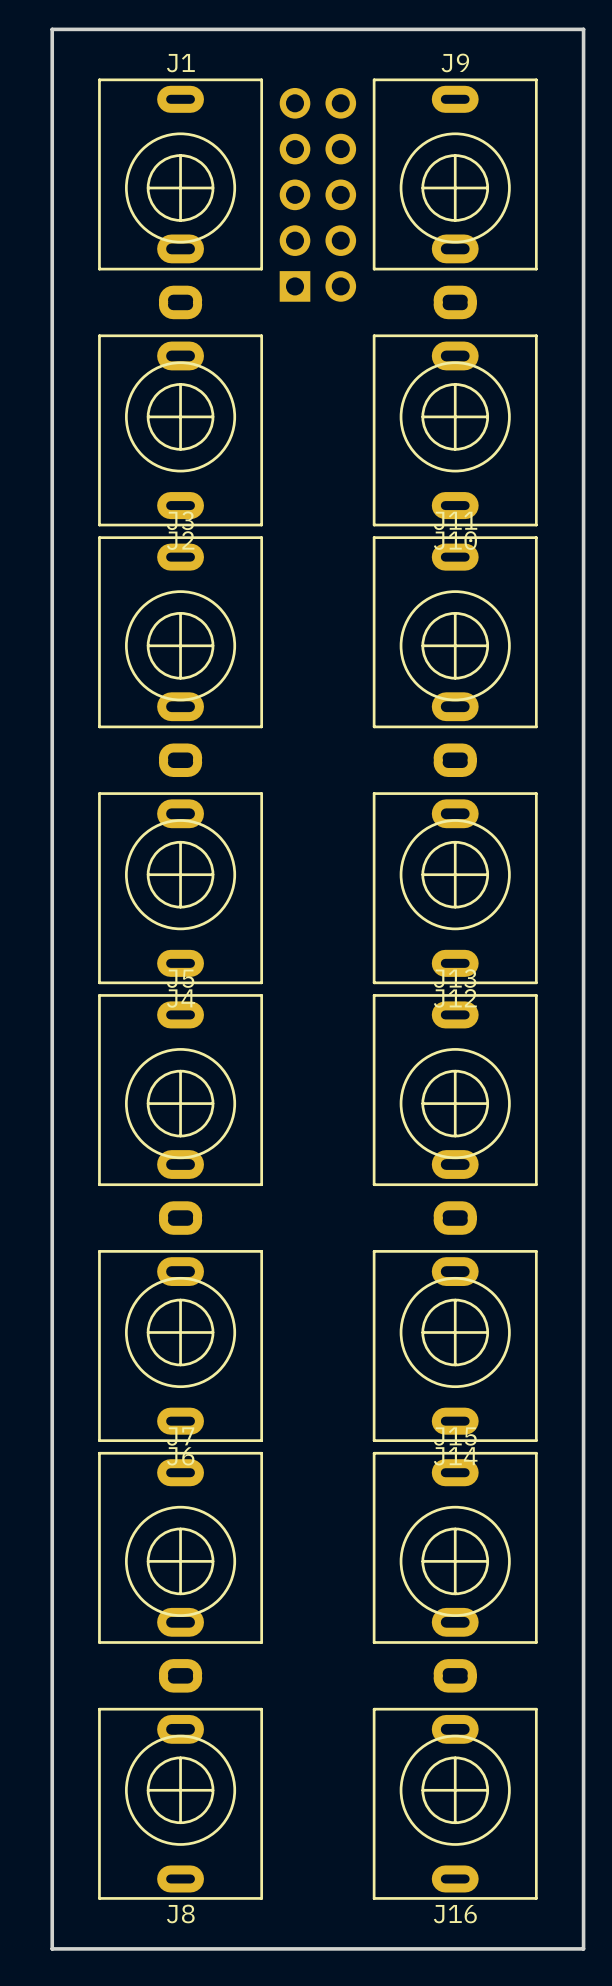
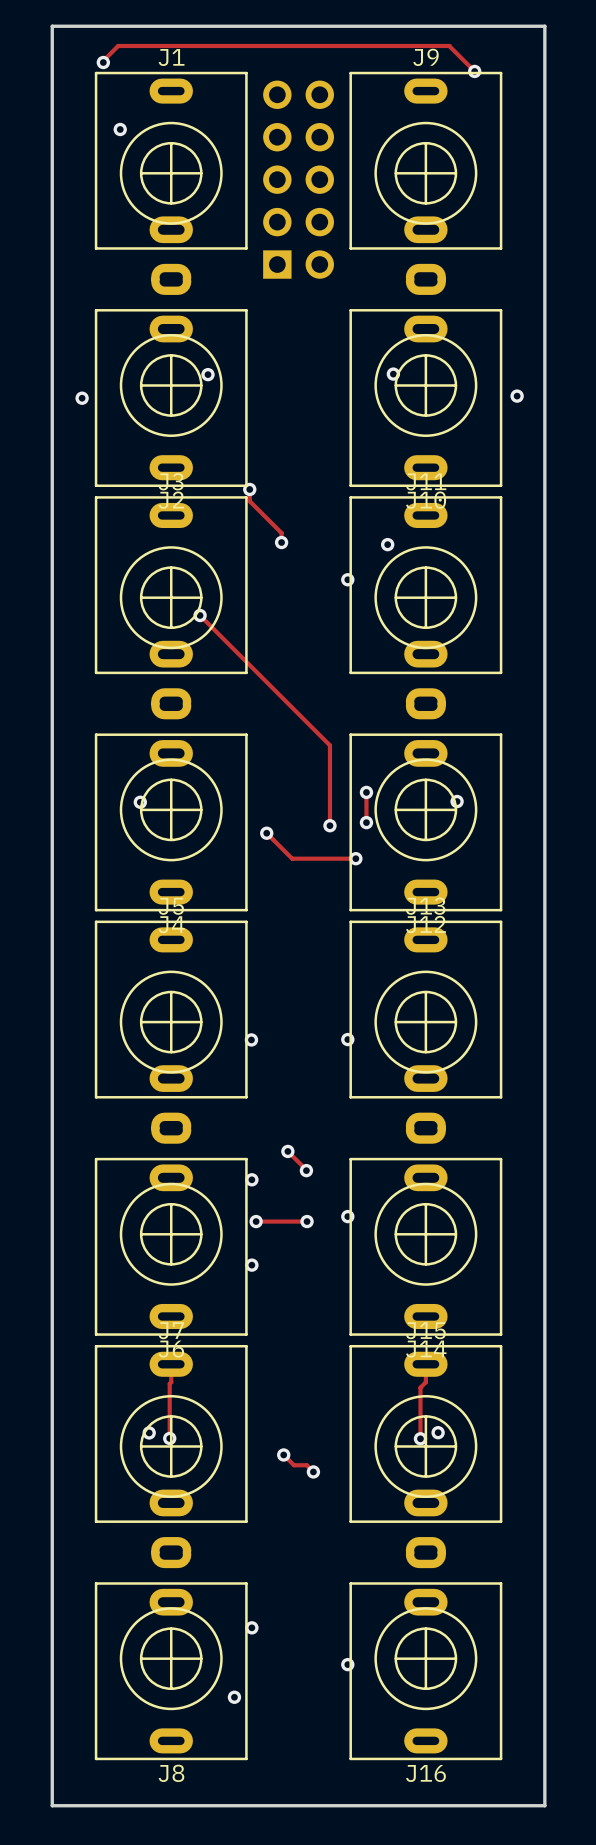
track: none -> (103, 62) (118, 45) (449, 45) (474, 71)
via: none -> (103, 62)
via: none -> (474, 71)
via: none -> (120, 129)
via: none -> (393, 374)
via: none -> (208, 374)
via: none -> (517, 396)
via: none -> (82, 398)
track: none -> (249, 489) (249, 501) (281, 533) (281, 542)
via: none -> (249, 489)
via: none -> (281, 542)
via: none -> (387, 544)
via: none -> (347, 579)
track: none -> (200, 615) (329, 745) (329, 825)
via: none -> (200, 615)
track: none -> (366, 792) (366, 822)
via: none -> (366, 792)
via: none -> (457, 801)
via: none -> (140, 802)
via: none -> (366, 822)
via: none -> (329, 825)
track: none -> (266, 833) (292, 858) (355, 858)
via: none -> (266, 833)
via: none -> (355, 858)
via: none -> (251, 1039)
via: none -> (347, 1039)
track: none -> (287, 1151) (306, 1170)
via: none -> (287, 1151)
via: none -> (306, 1170)
via: none -> (251, 1179)
via: none -> (347, 1216)
track: none -> (256, 1221) (307, 1221)
via: none -> (256, 1221)
via: none -> (307, 1221)
via: none -> (251, 1265)
track: none -> (171, 1364) (169, 1438)
track: none -> (425, 1364) (425, 1382) (420, 1387) (420, 1438)
via: none -> (149, 1432)
via: none -> (438, 1432)
via: none -> (169, 1438)
via: none -> (420, 1438)
track: none -> (283, 1454) (294, 1465) (306, 1465) (313, 1471)
via: none -> (283, 1454)
via: none -> (313, 1471)
via: none -> (251, 1627)
via: none -> (347, 1664)
via: none -> (234, 1697)

